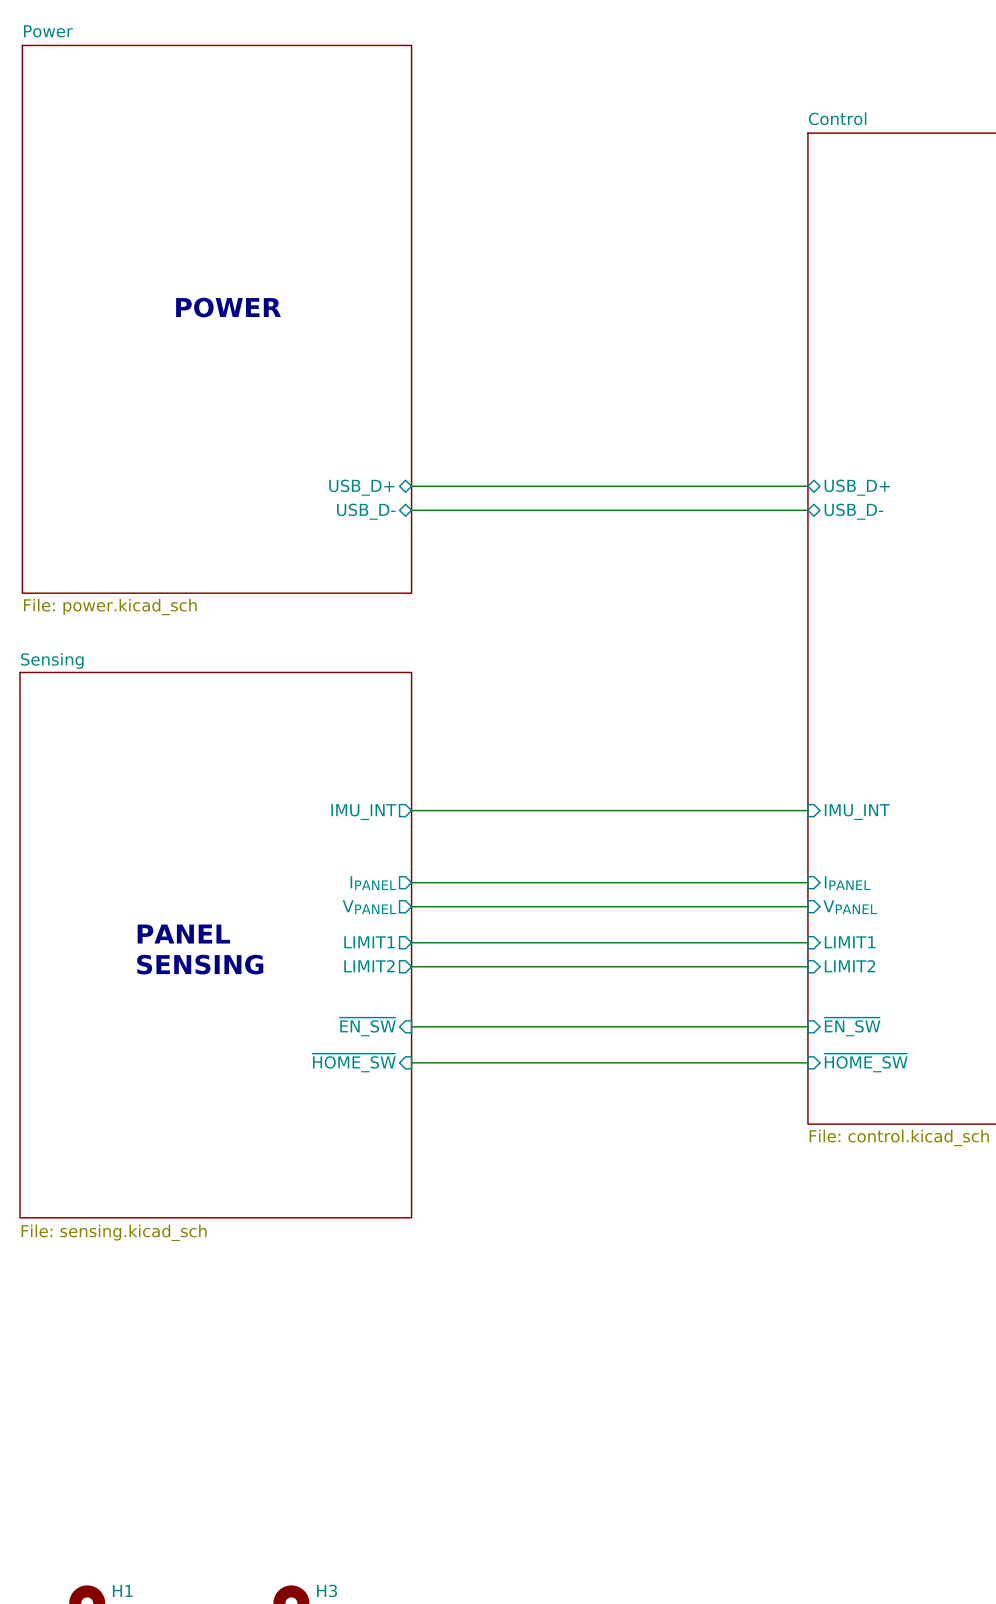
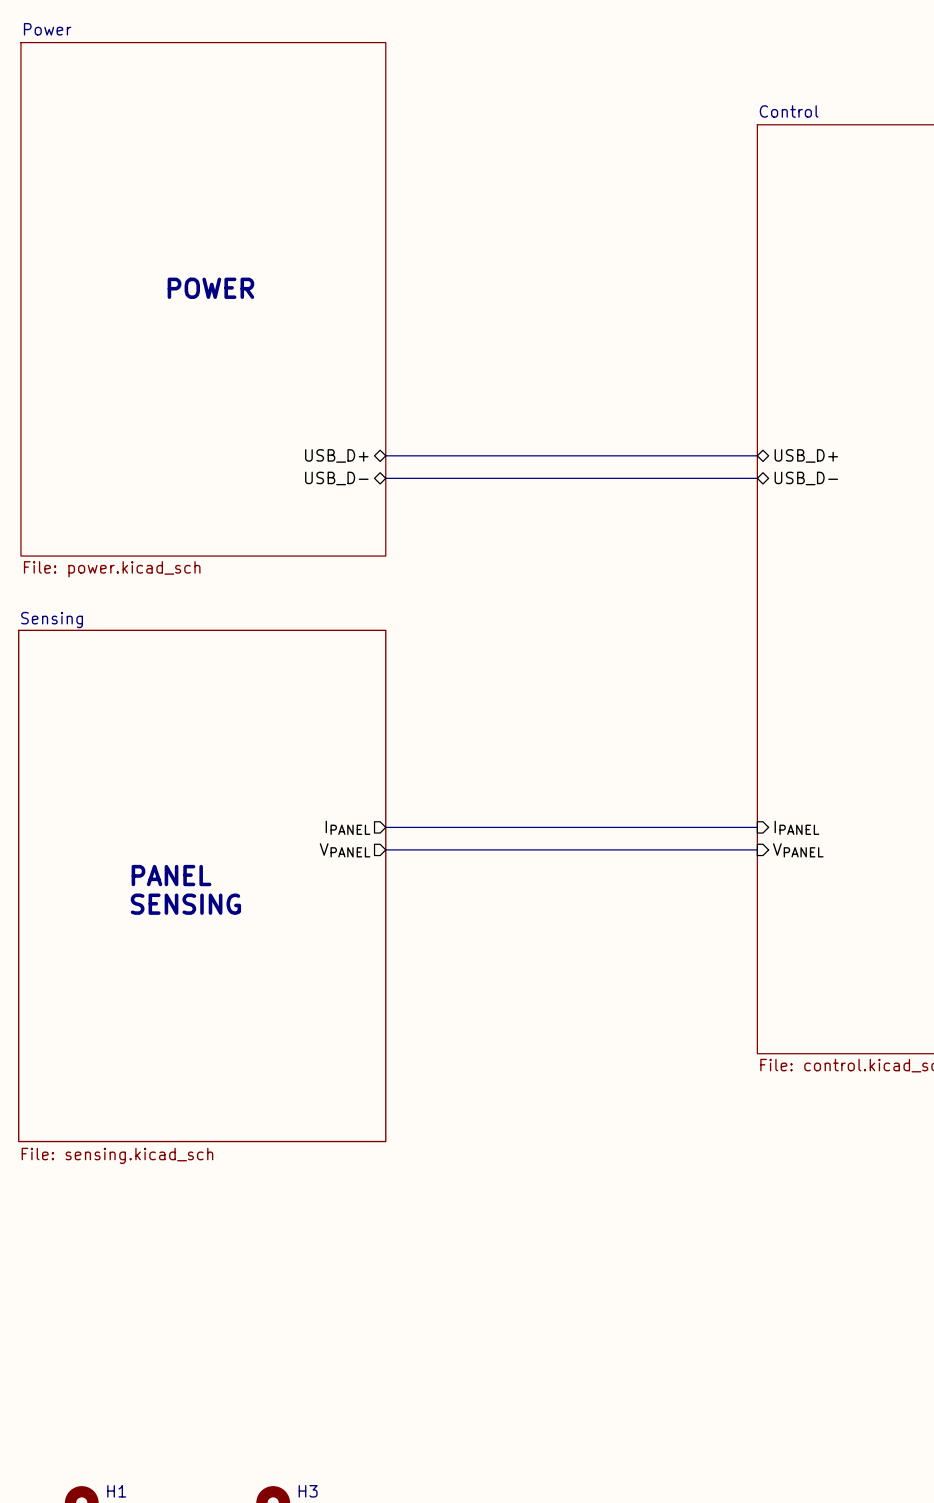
wire: (411, 810) (807, 810) -> none
sheet pin: IMU_INT (363, 812) -> none
sheet pin: IMU_INT (857, 812) -> none
sheet pin: LIMIT1 (369, 942) -> none
wire: (411, 942) (807, 942) -> none
sheet pin: LIMIT1 (850, 942) -> none
sheet pin: LIMIT2 (369, 966) -> none
wire: (411, 966) (807, 966) -> none
sheet pin: LIMIT2 (850, 966) -> none
sheet pin: ~{EN_SW} (367, 1026) -> none
wire: (411, 1026) (807, 1026) -> none
sheet pin: ~{EN_SW} (852, 1026) -> none
sheet pin: ~{HOME_SW} (354, 1062) -> none
wire: (411, 1062) (807, 1062) -> none
sheet pin: ~{HOME_SW} (866, 1062) -> none

